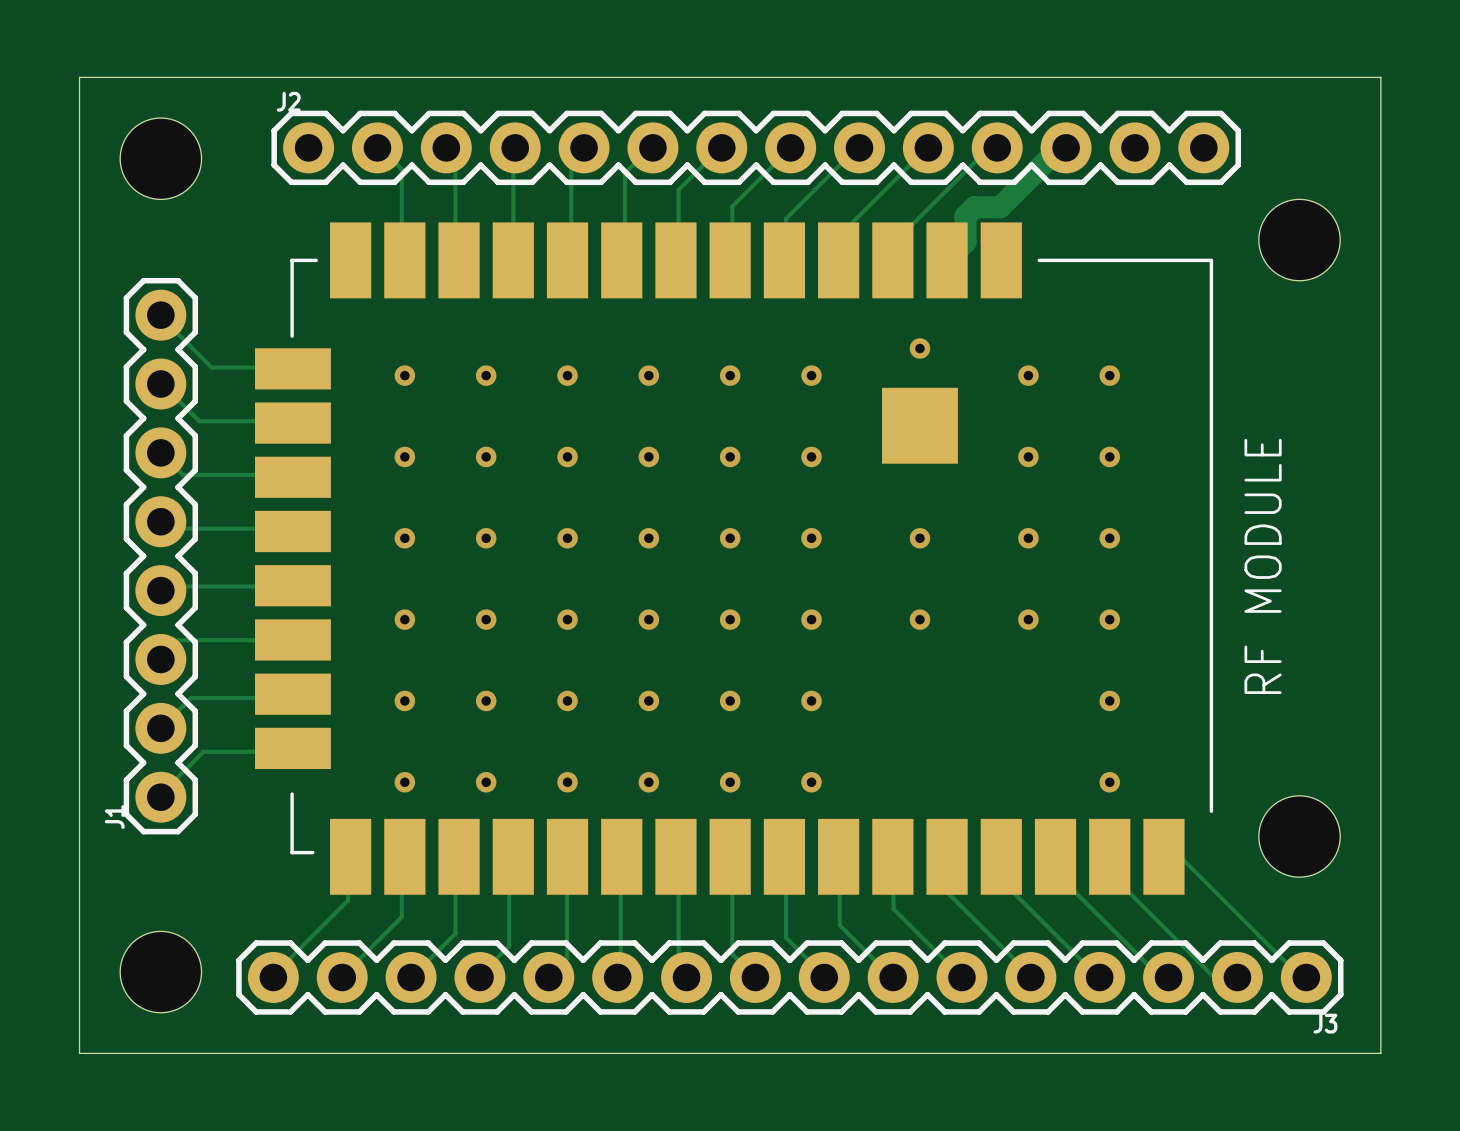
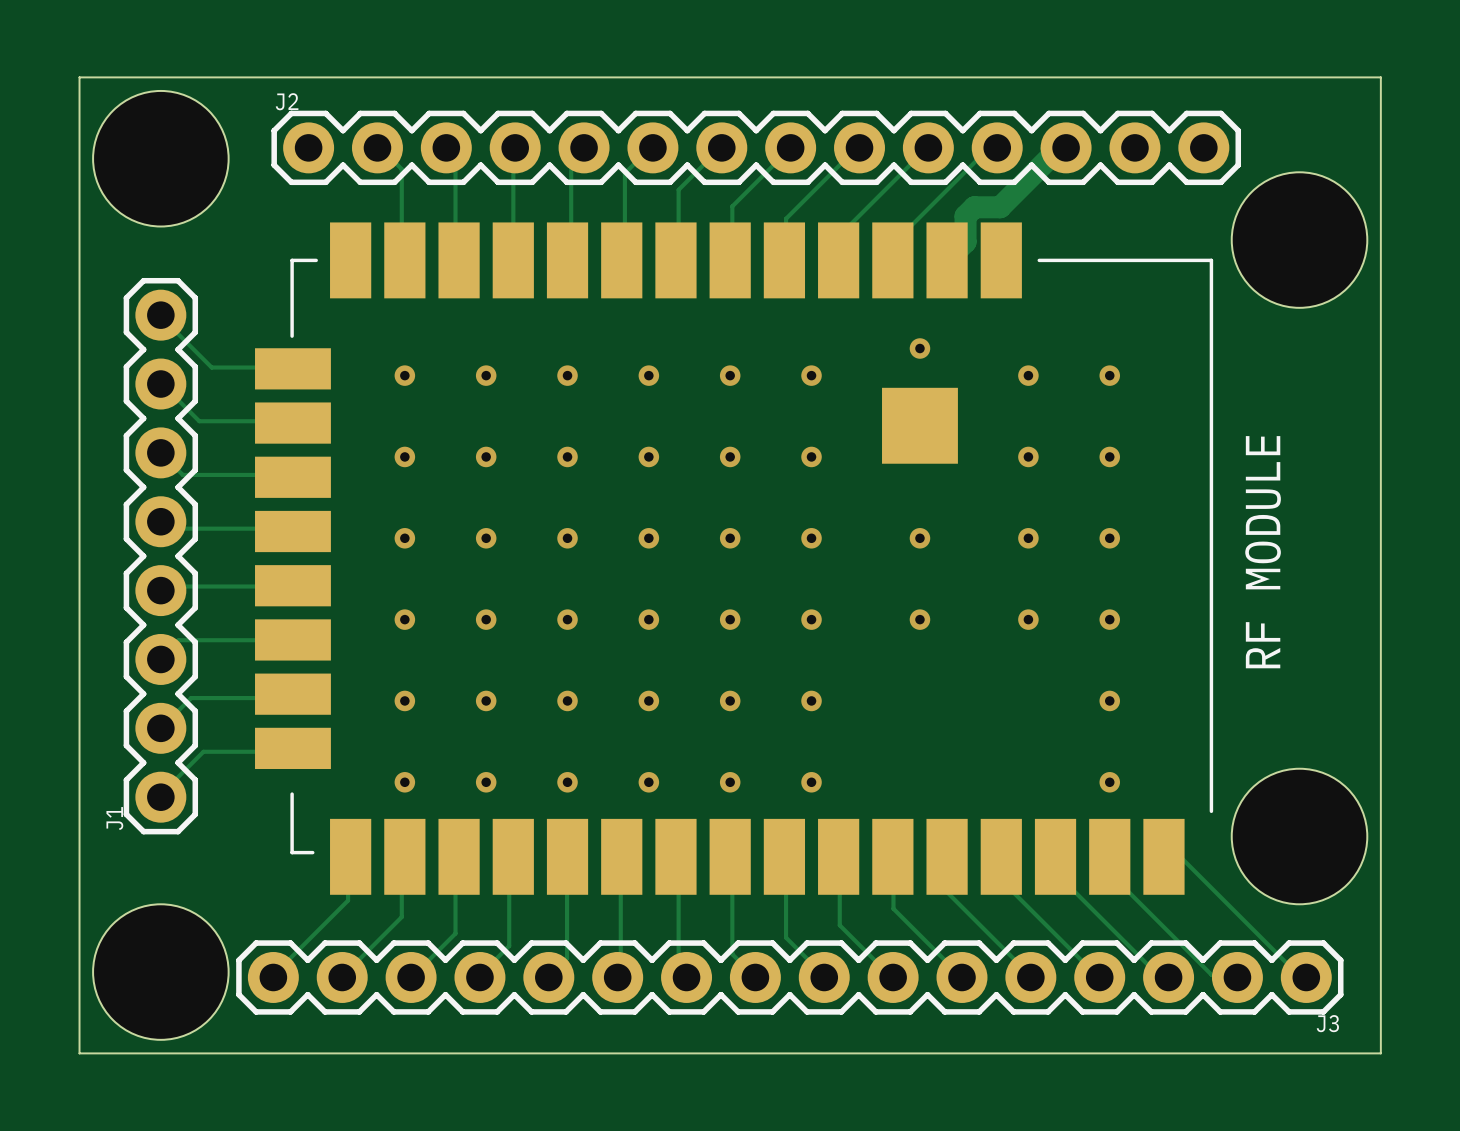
hole size: [120, 118, 202, 200] -> [93, 90, 229, 227]
hole size: [1258, 199, 1341, 281] -> [1231, 172, 1368, 308]
hole size: [1258, 795, 1341, 878] -> [1231, 768, 1368, 905]
hole size: [120, 931, 202, 1013] -> [93, 904, 229, 1040]

